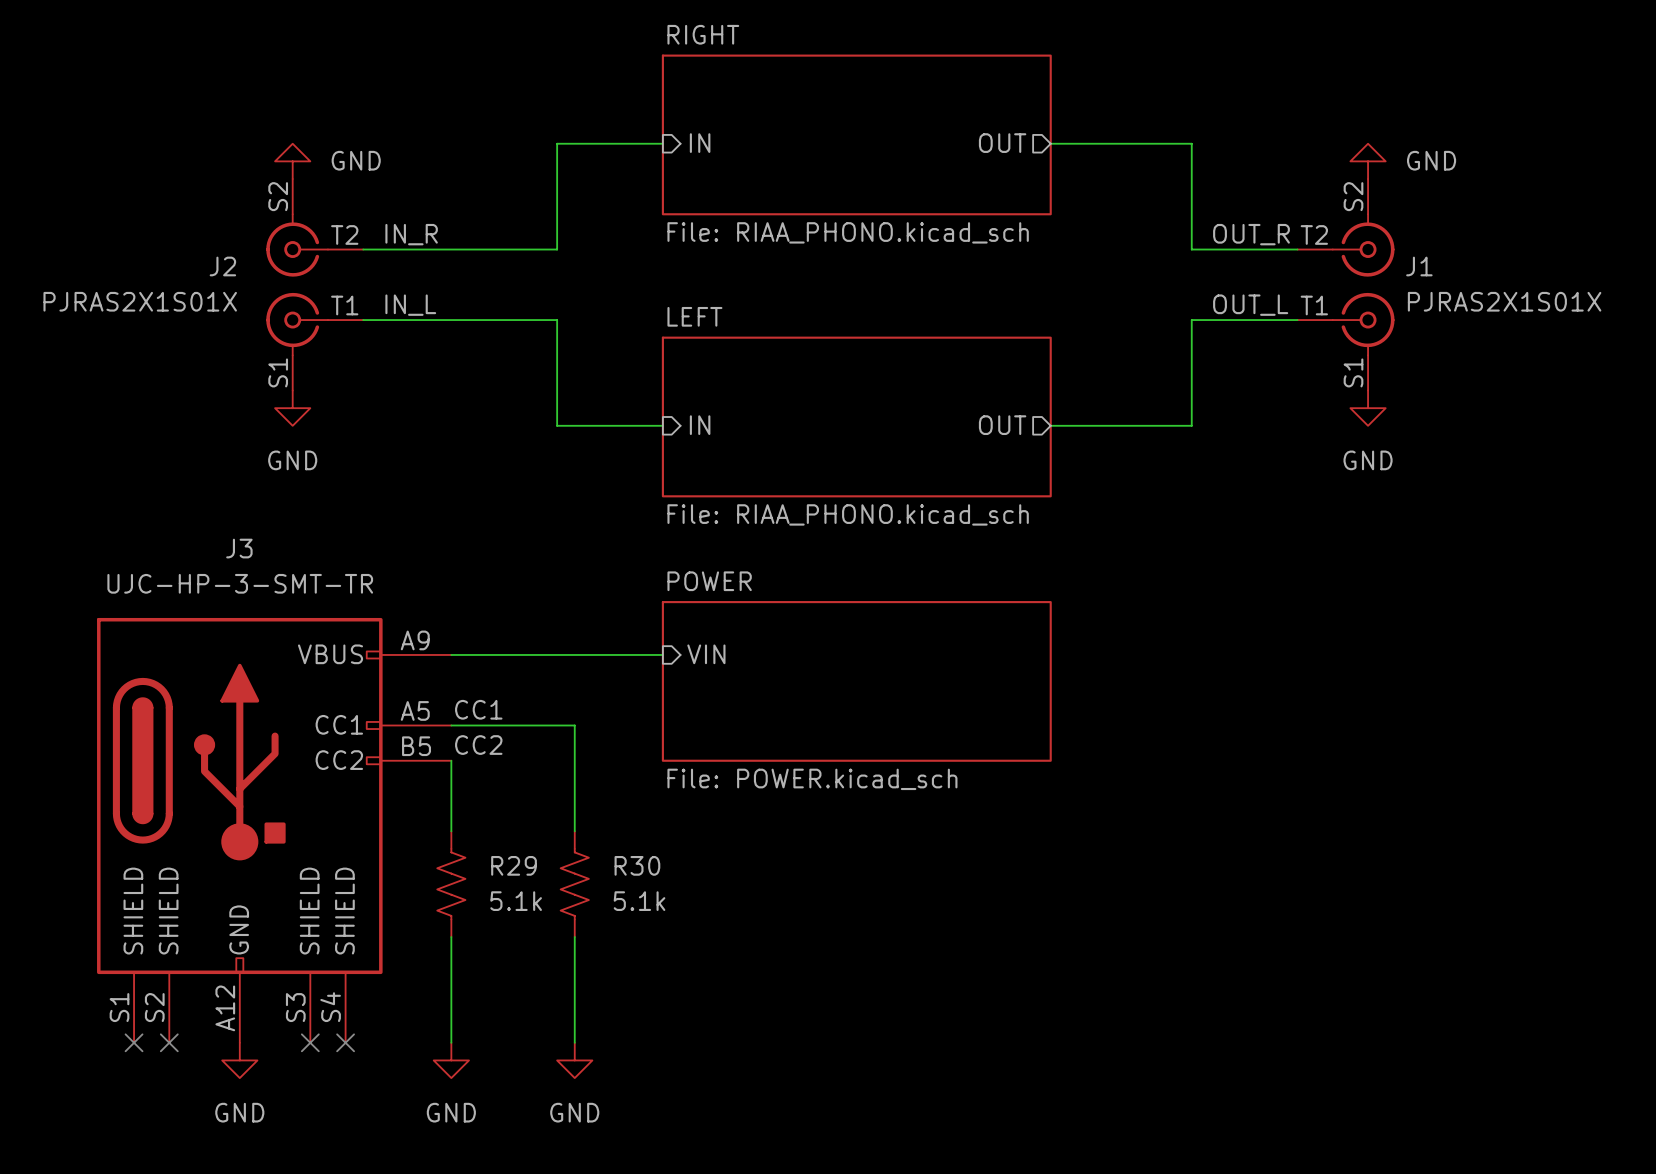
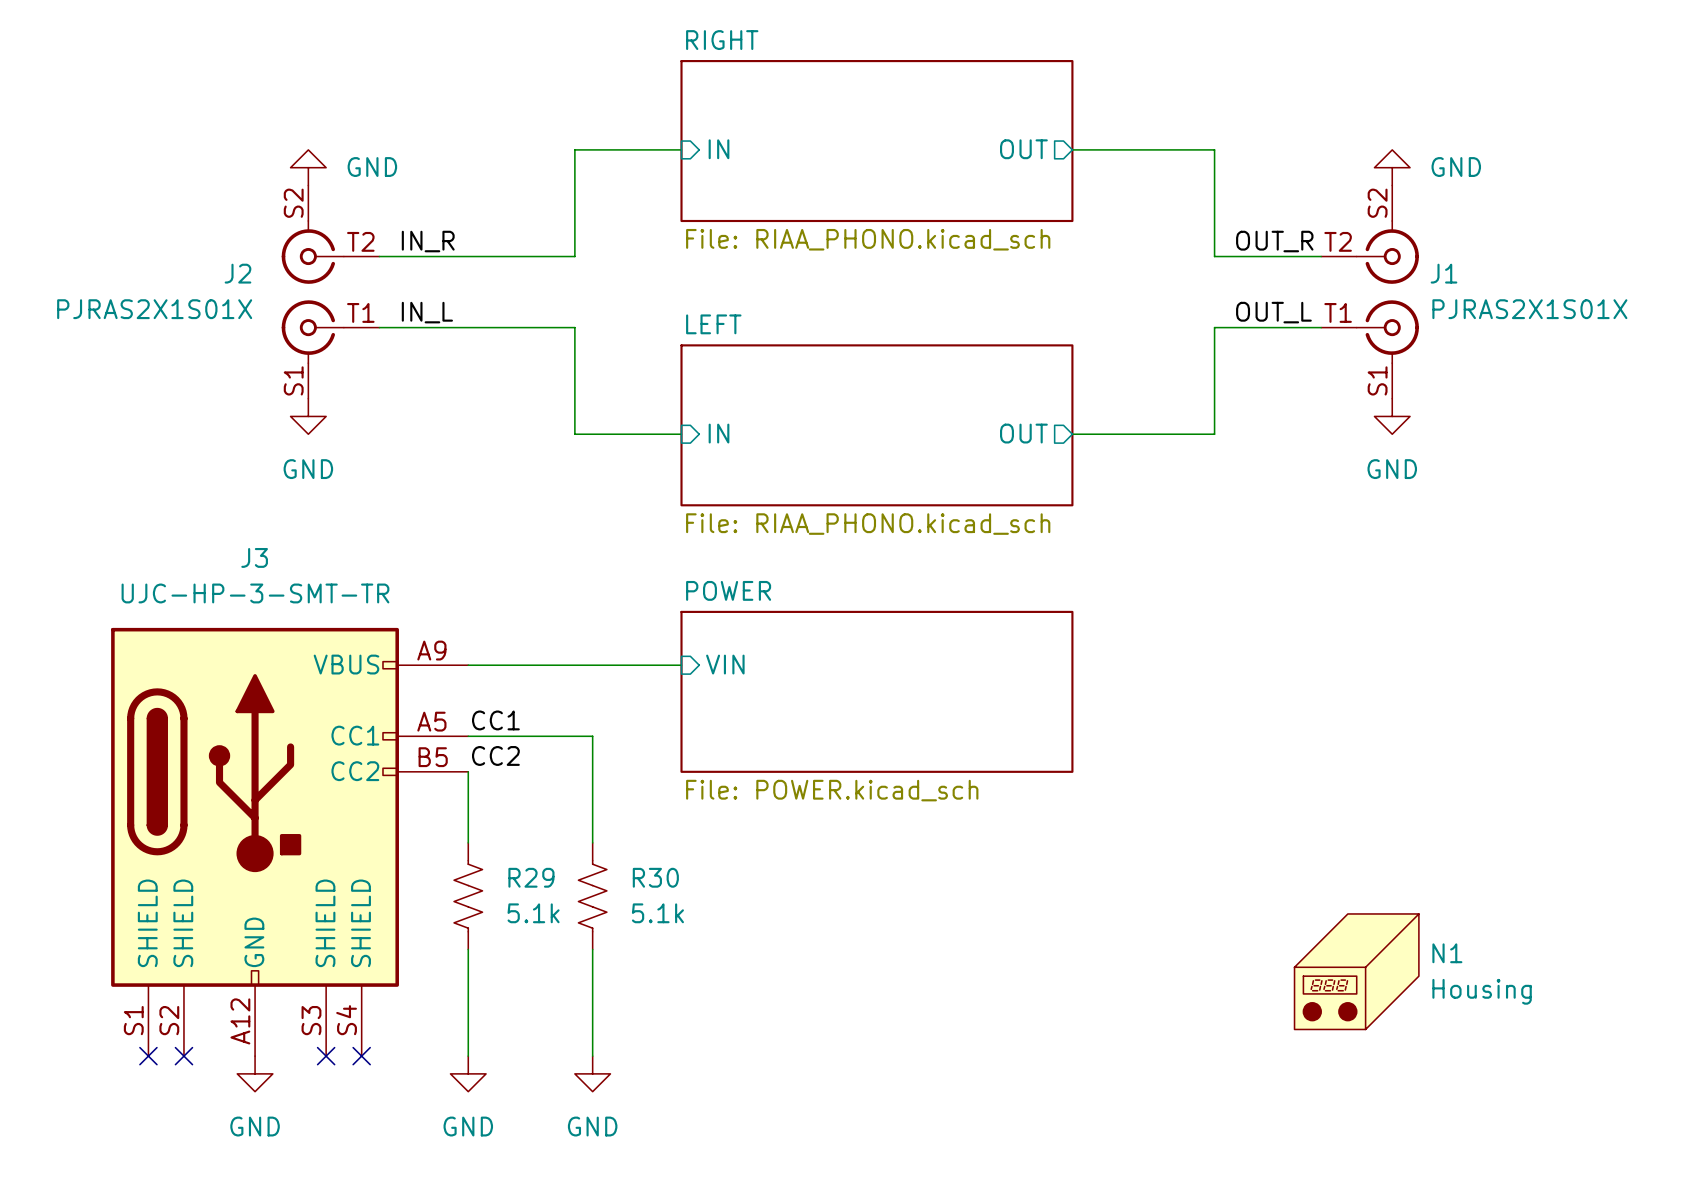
N1: none -> Housing (1356, 971)

